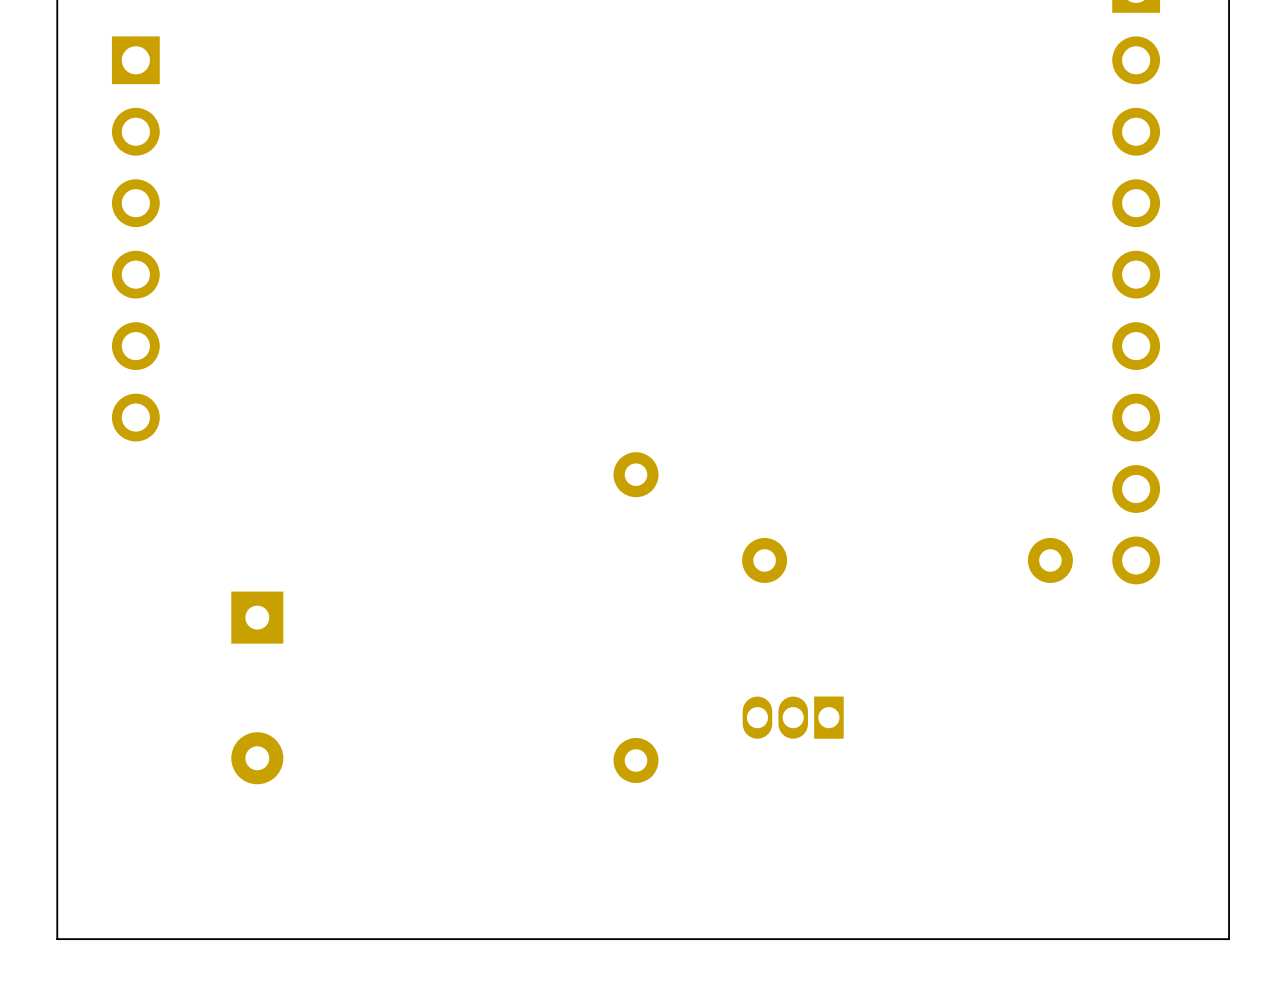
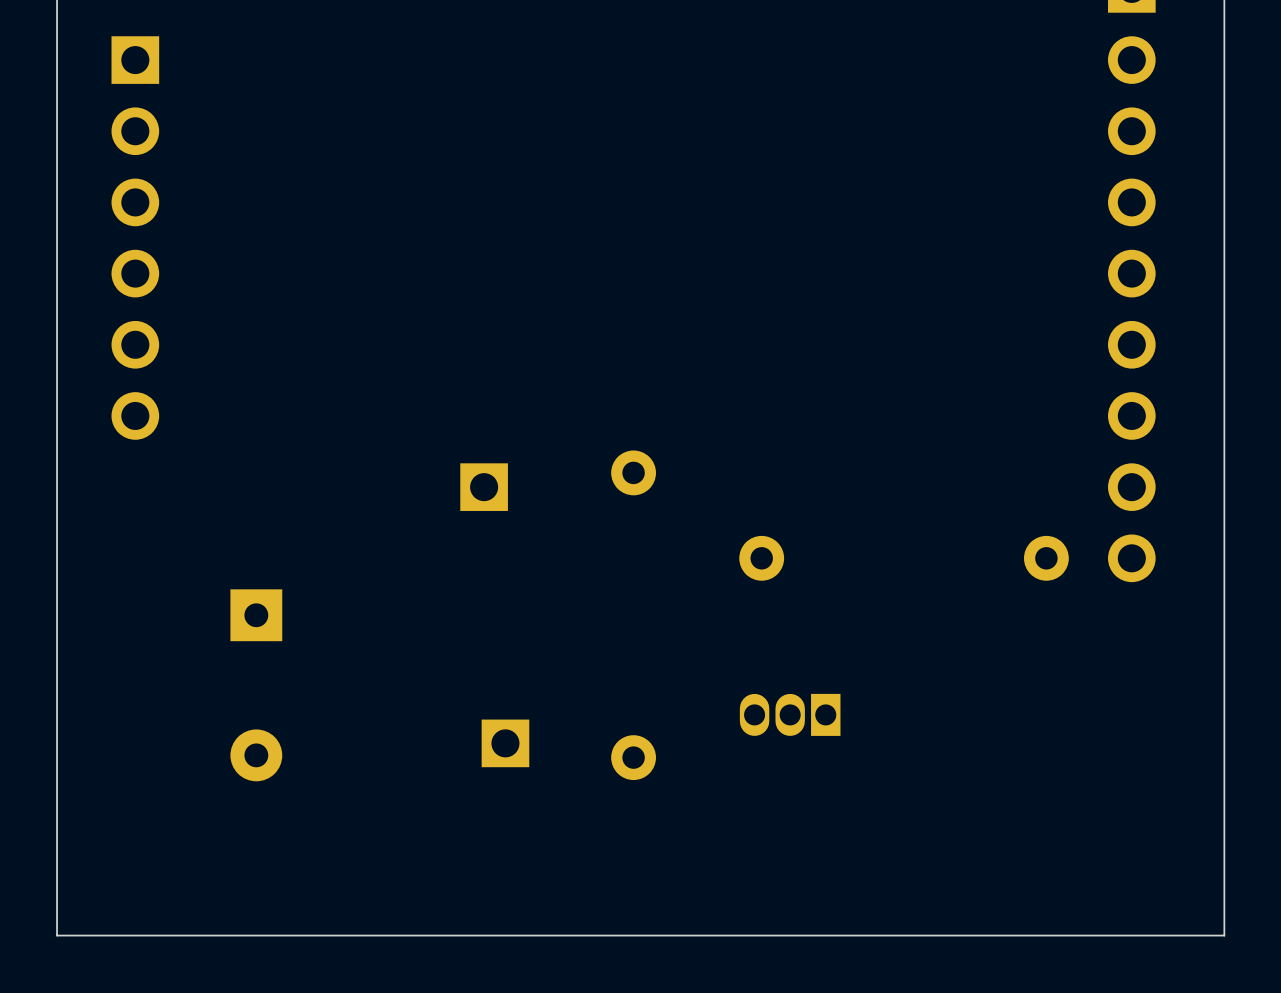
part: none -> (484, 487)
part: none -> (505, 743)

